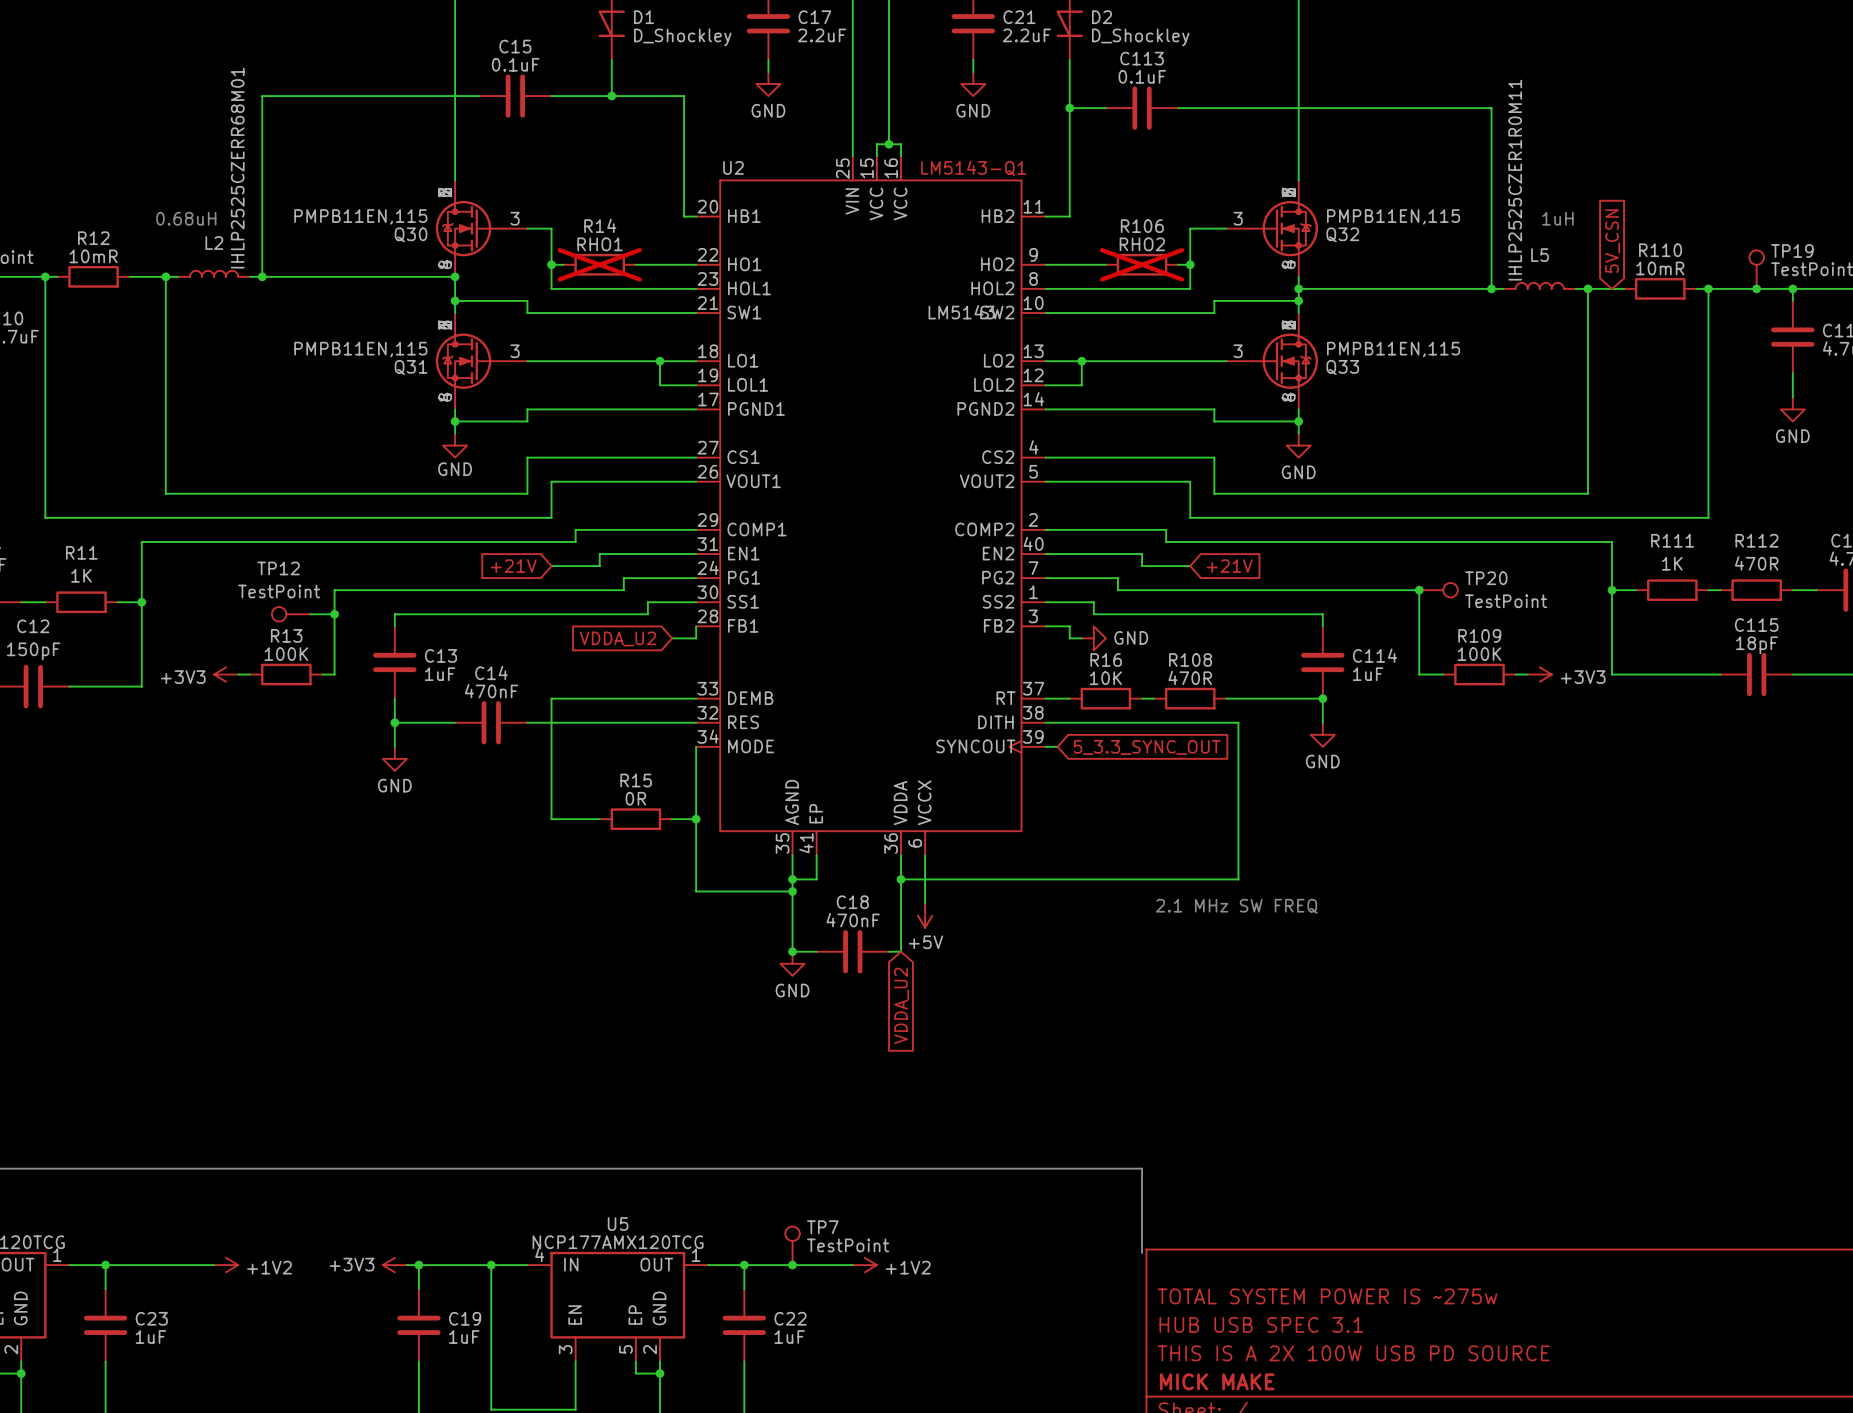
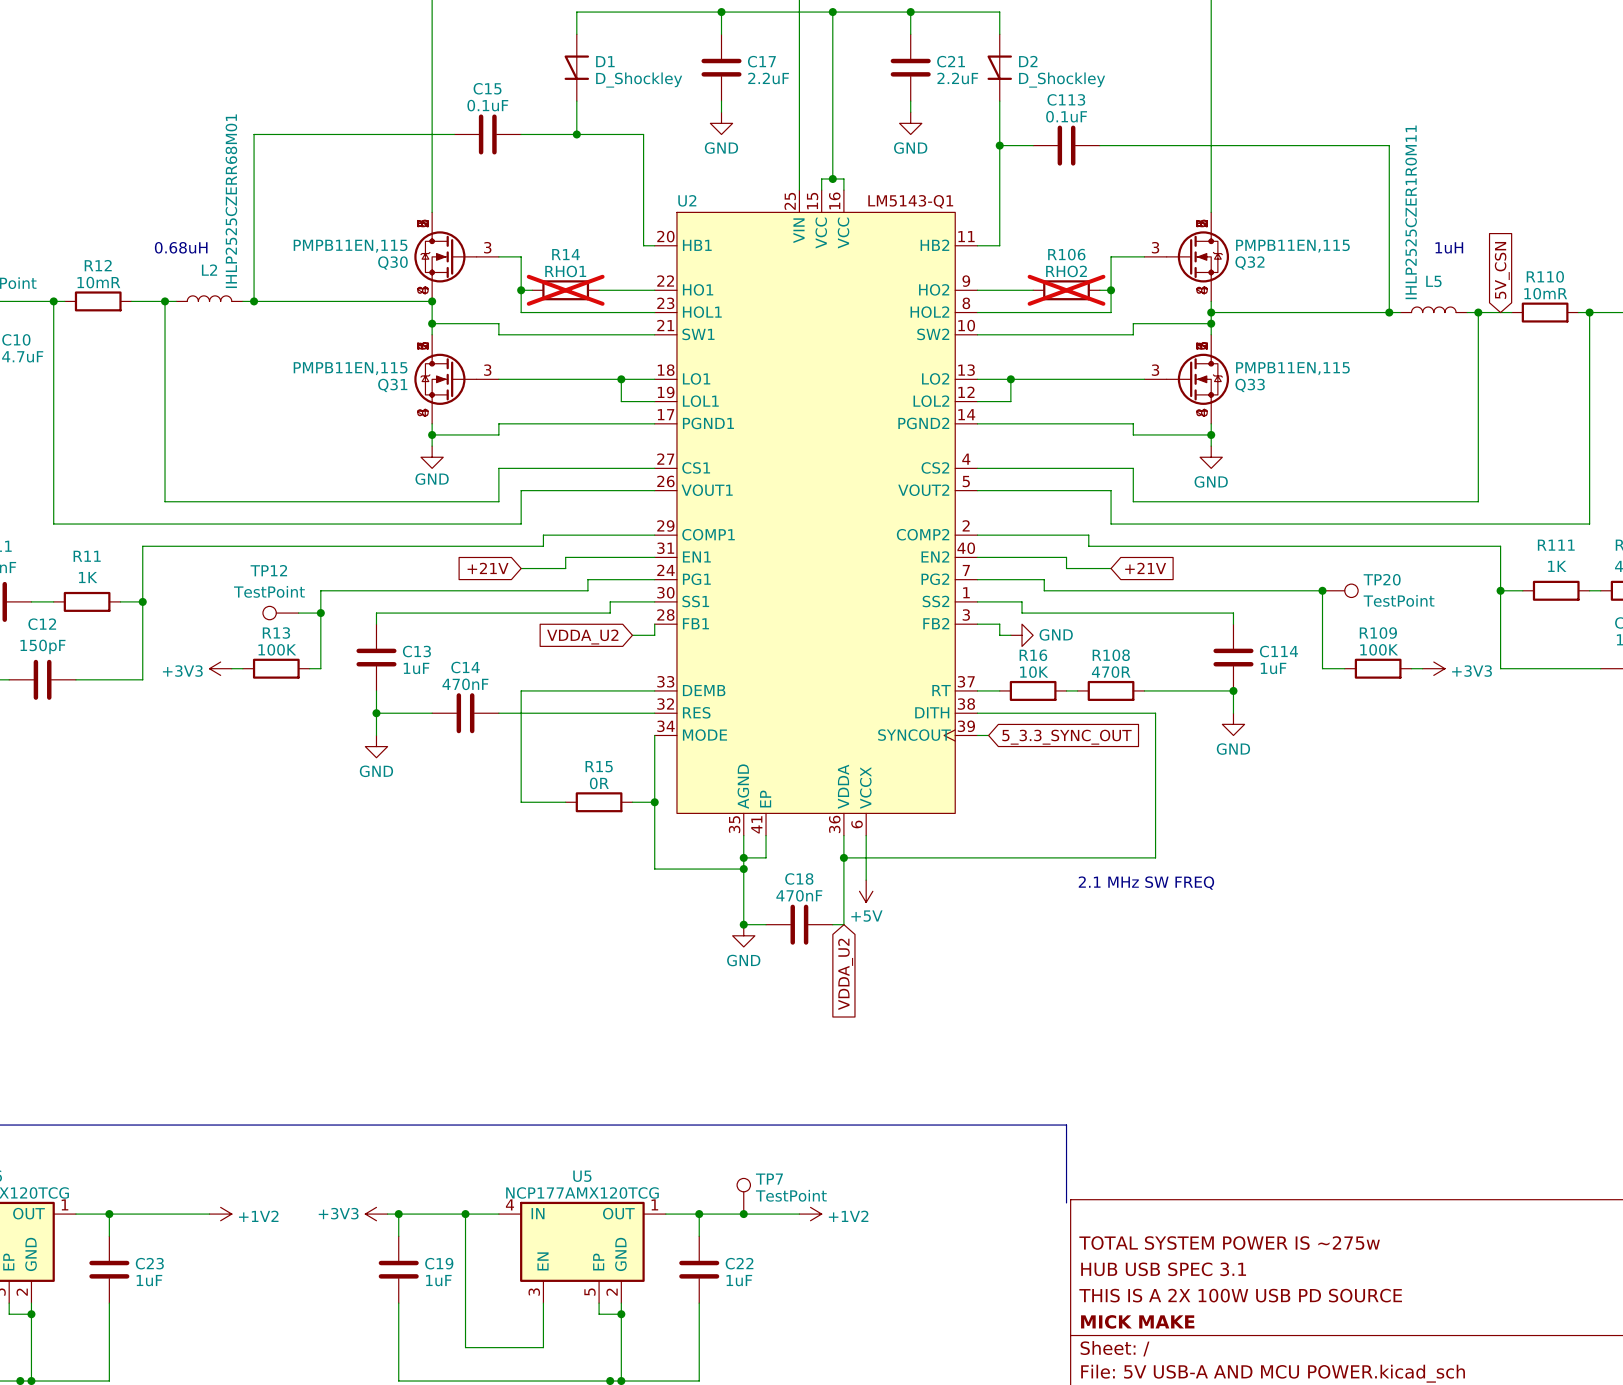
U2 value: LM5143 (961, 312) -> none

